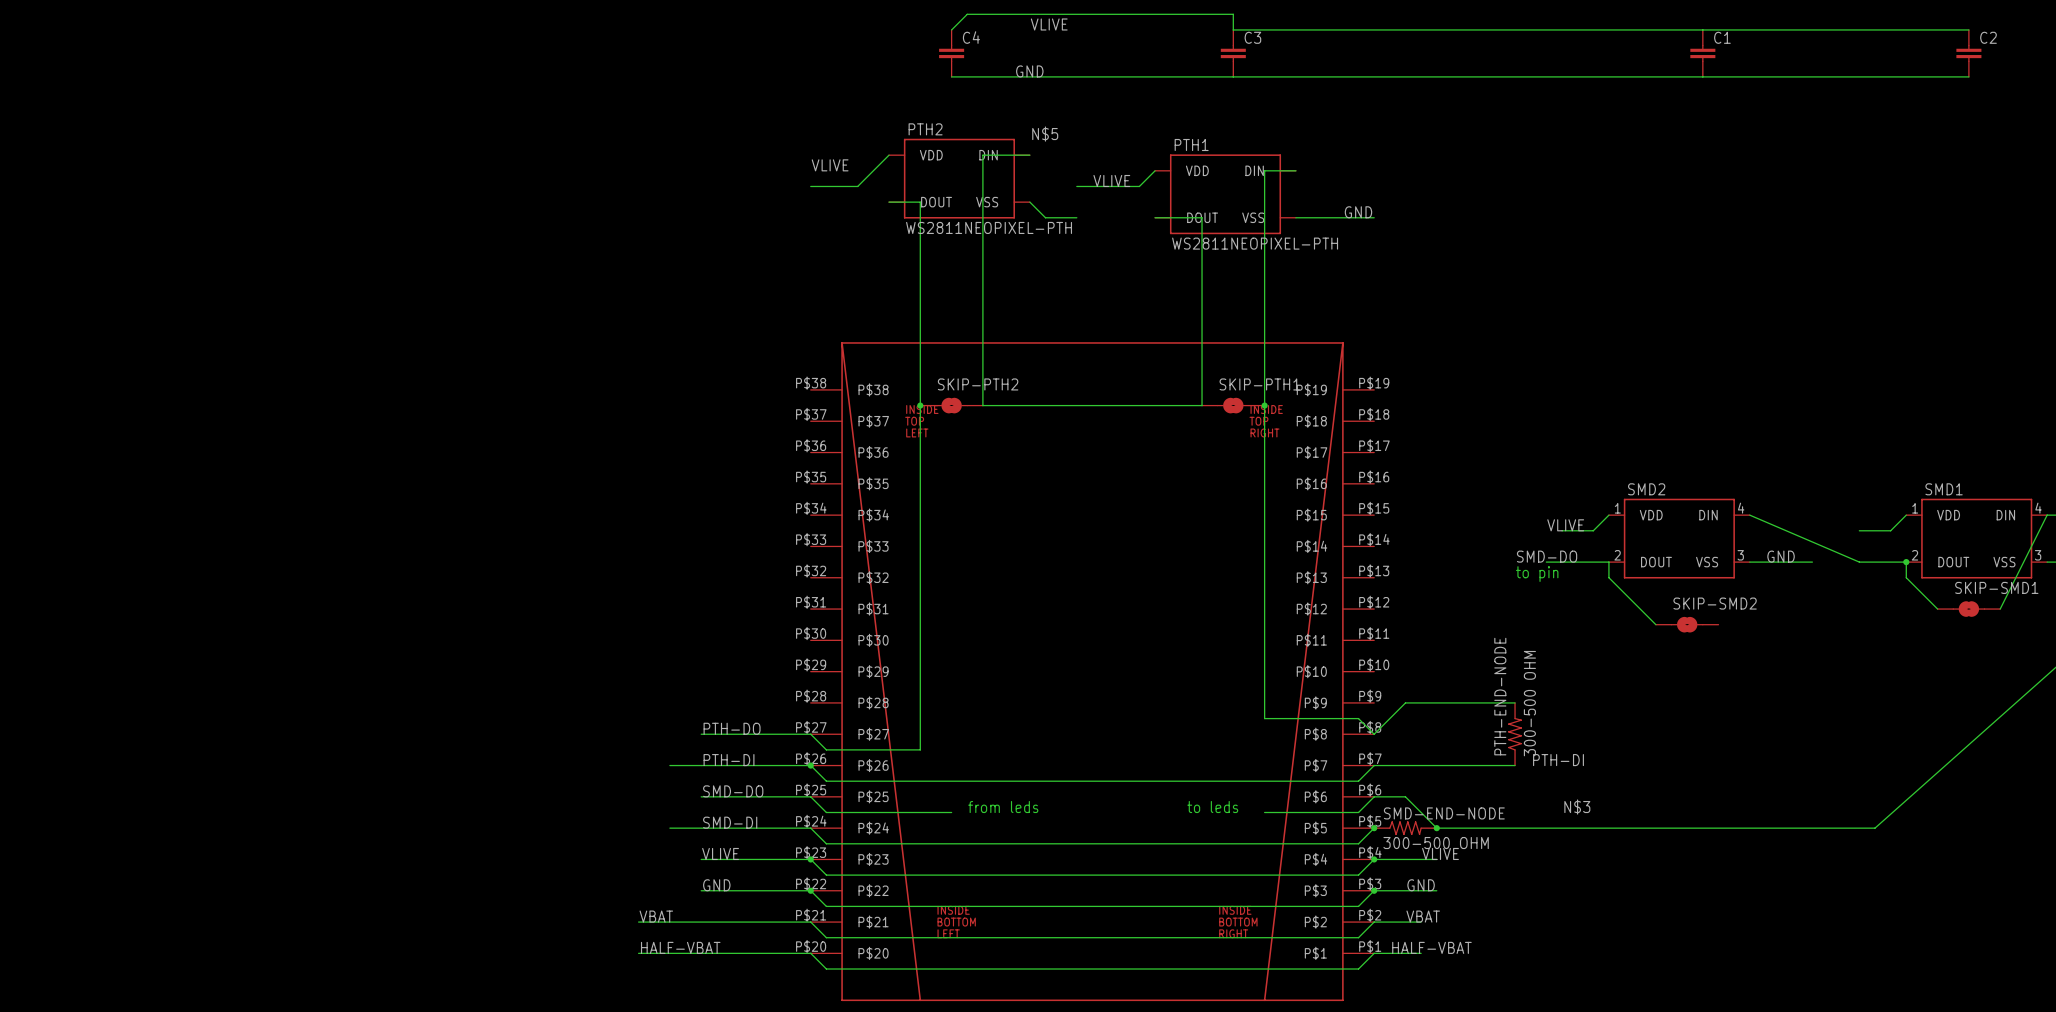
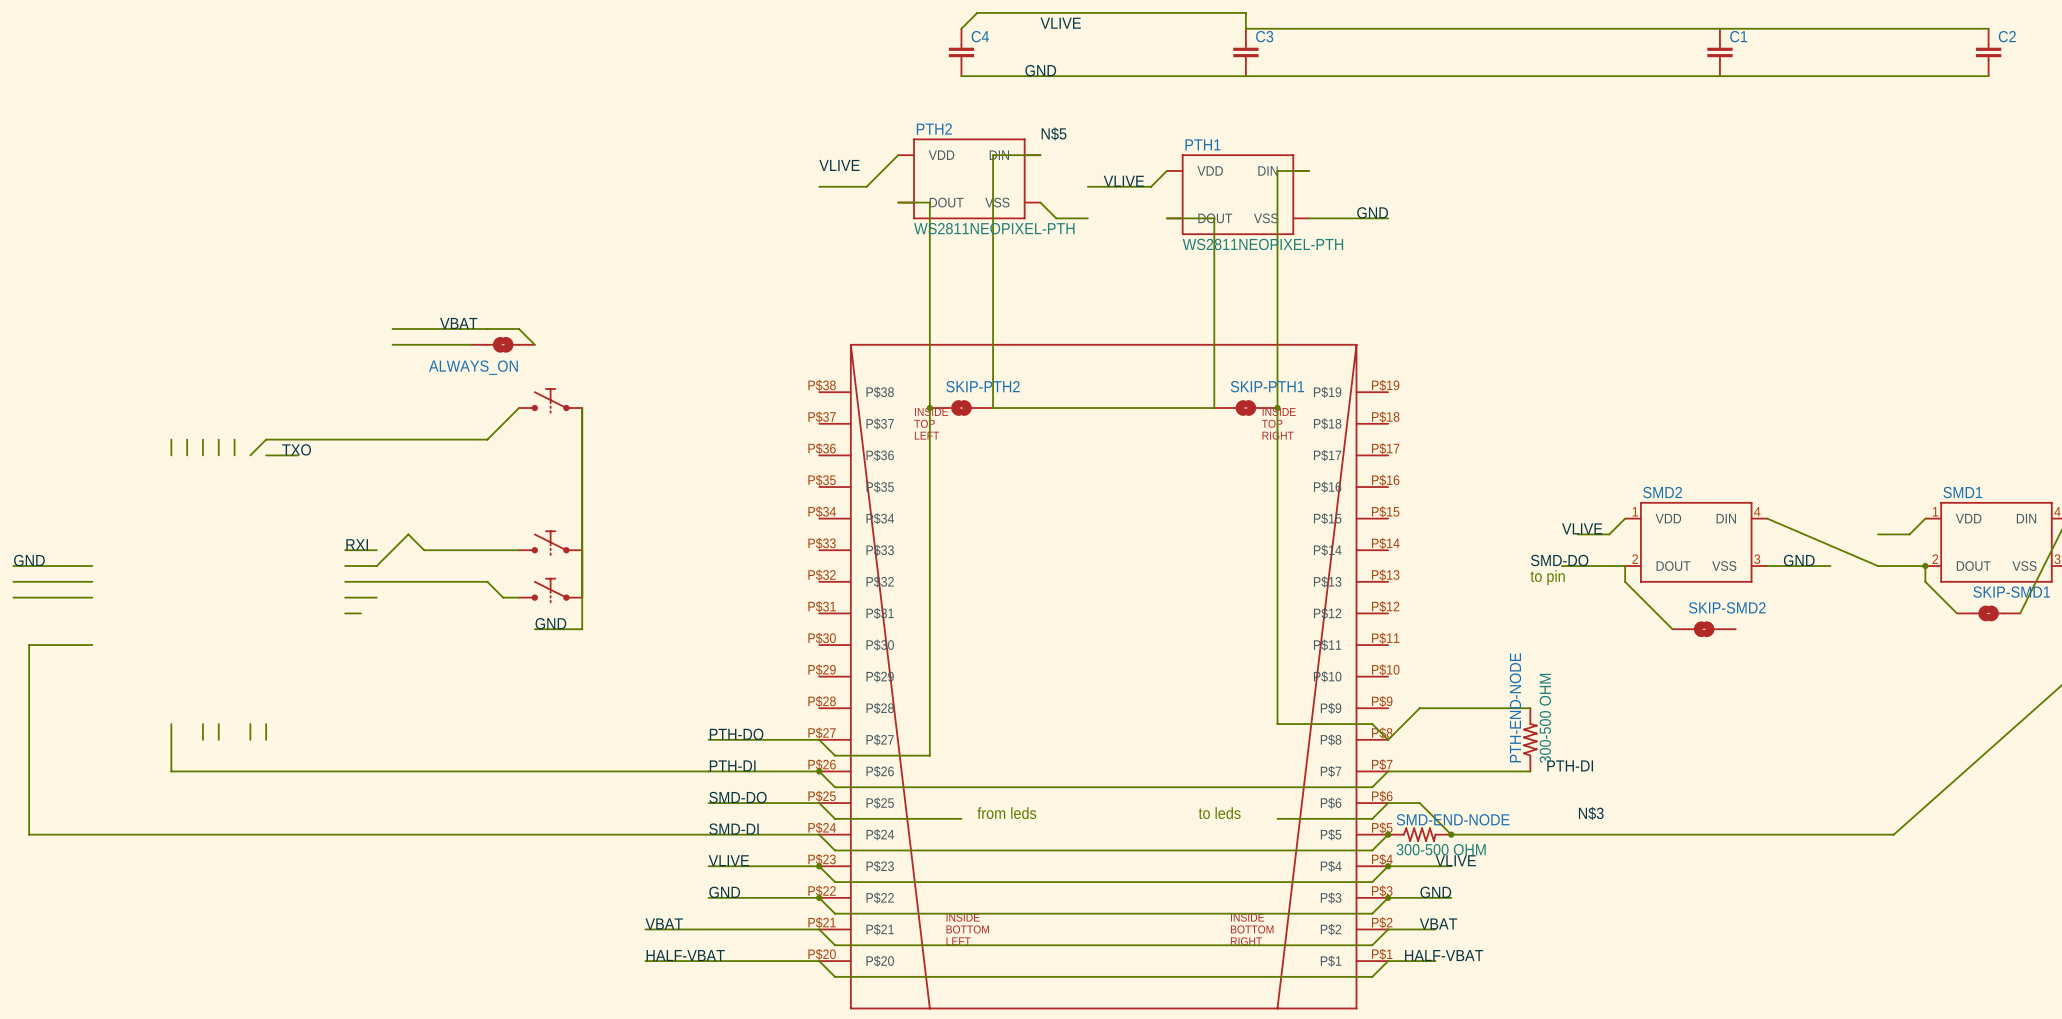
label: none -> VBAT (458, 323)
wire: none -> (392, 328) (518, 328) (534, 344)
wire: none -> (392, 344) (471, 344)
ALWAYS_ON: none -> (503, 344)
part: none -> (550, 400)
wire: none -> (518, 408) (487, 439) (266, 439) (250, 455)
wire: none -> (582, 408) (582, 629) (534, 629)
wire: none -> (171, 439) (171, 455)
wire: none -> (187, 439) (187, 455)
wire: none -> (202, 439) (202, 455)
wire: none -> (218, 439) (218, 455)
wire: none -> (234, 439) (234, 455)
label: none -> TXO (296, 449)
wire: none -> (266, 455) (297, 455)
part: none -> (550, 543)
label: none -> RXI (357, 544)
wire: none -> (345, 550) (376, 550)
wire: none -> (518, 550) (424, 550) (408, 534) (376, 566) (345, 566)
label: none -> GND (29, 560)
wire: none -> (13, 566) (92, 566)
wire: none -> (13, 581) (92, 581)
wire: none -> (345, 581) (487, 581) (503, 597) (518, 597)
part: none -> (550, 590)
wire: none -> (13, 597) (92, 597)
wire: none -> (345, 597) (376, 597)
wire: none -> (345, 613) (360, 613)
label: none -> GND (550, 623)
wire: none -> (92, 645) (29, 645) (29, 834) (677, 834)
wire: none -> (171, 724) (171, 771) (677, 771)
wire: none -> (202, 724) (202, 739)
wire: none -> (218, 724) (218, 739)
wire: none -> (250, 724) (250, 739)
wire: none -> (266, 724) (266, 739)

